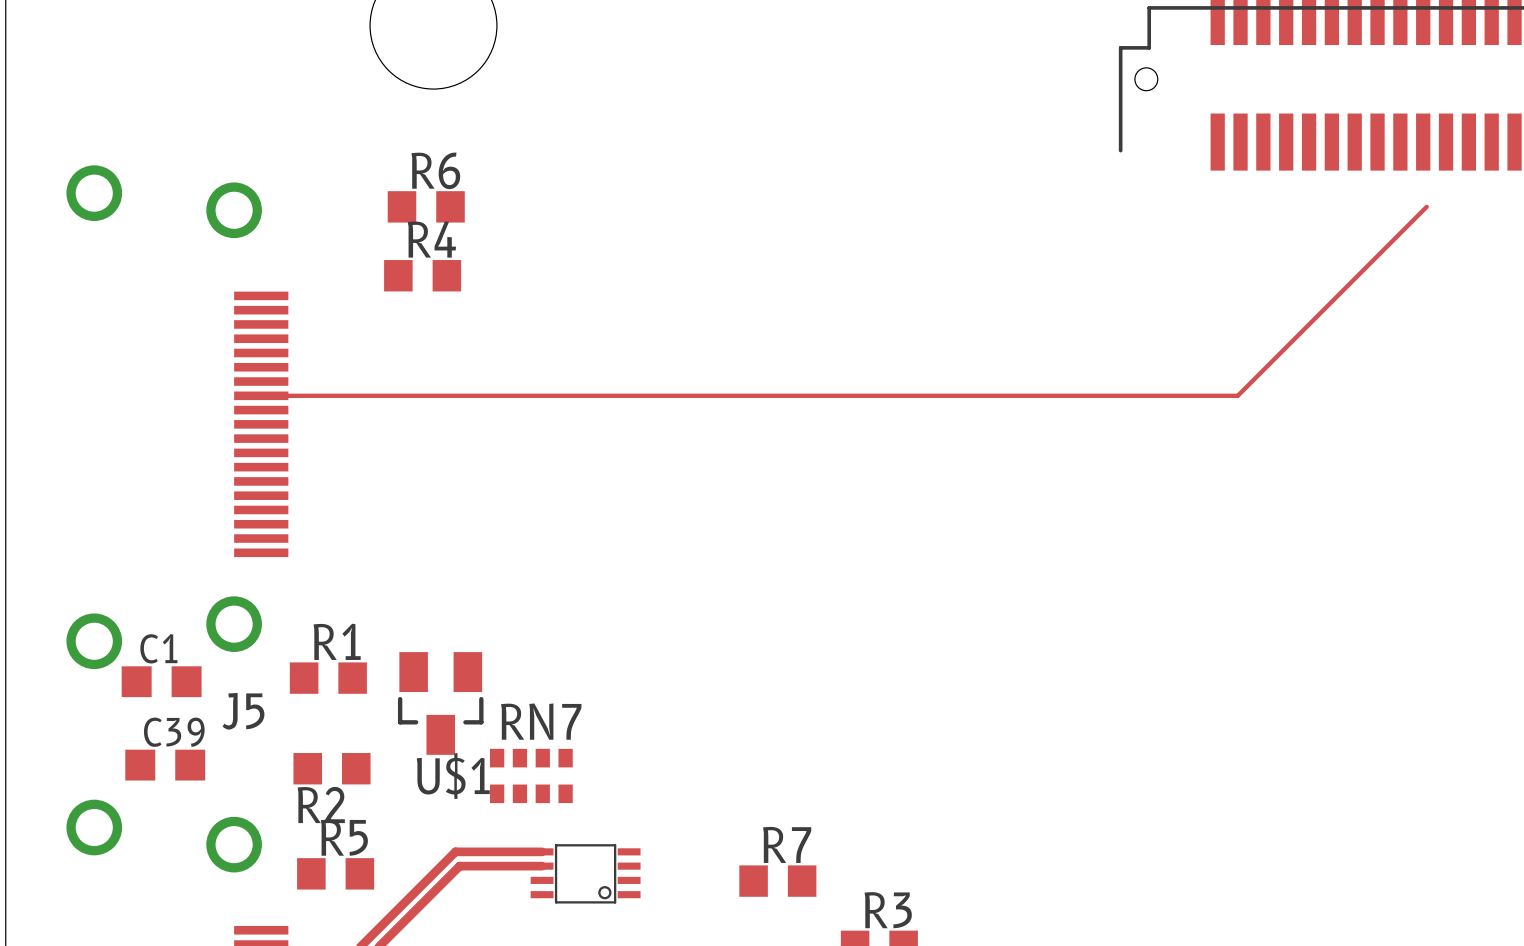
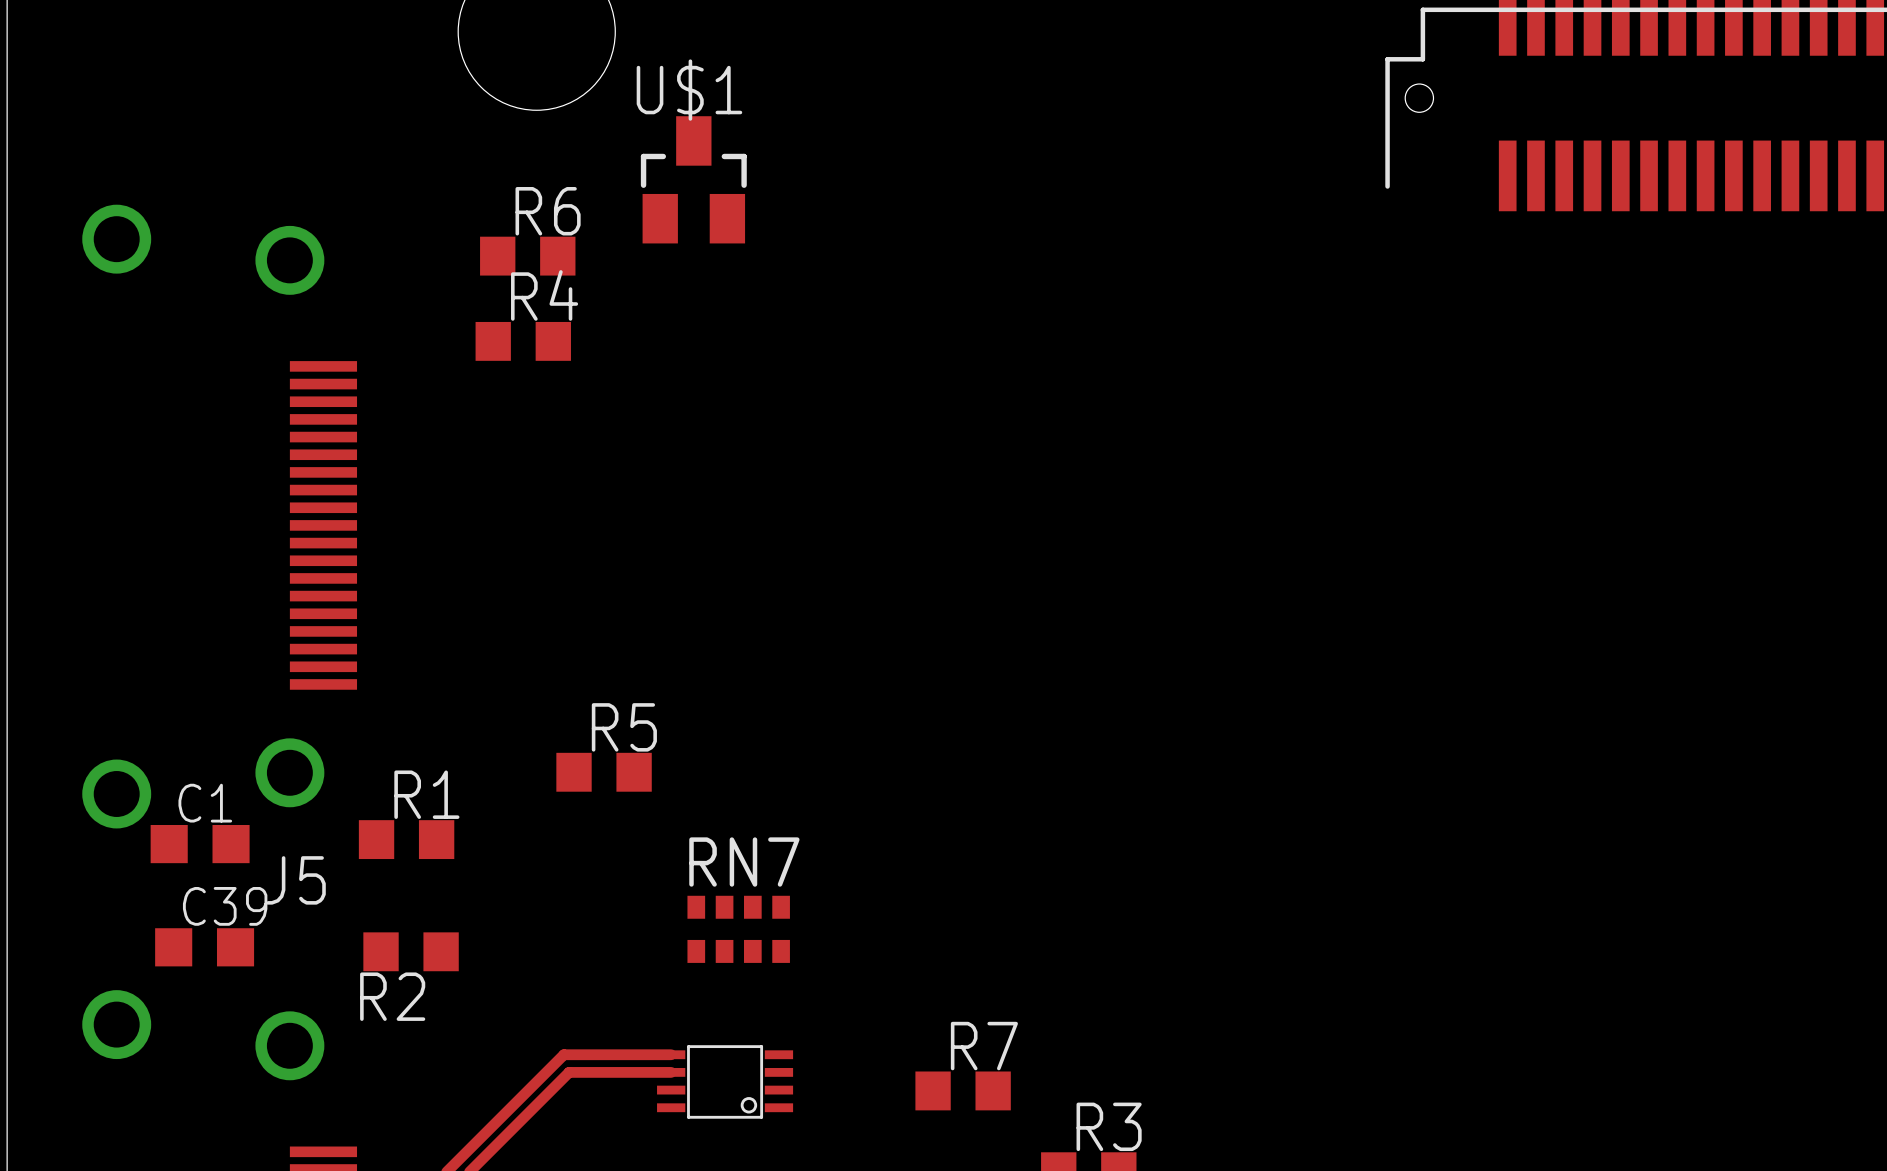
top track: (1426, 206) (1237, 395) (261, 395) -> none
U$1 rotation: 0° (440, 703) -> 180° (693, 179)
U$1 position: (440, 703) -> (693, 179)
RN7 position: (531, 775) -> (738, 929)
R5 position: (335, 873) -> (604, 772)

